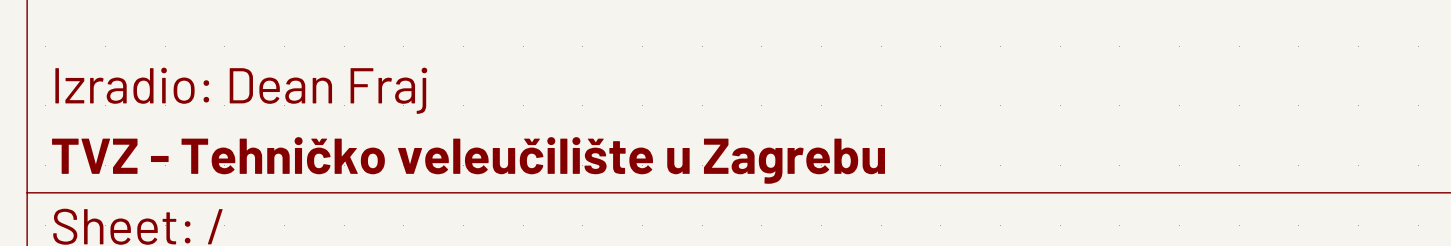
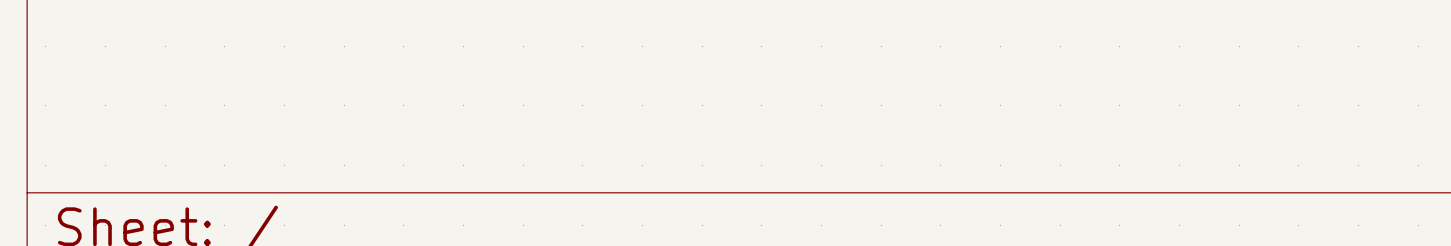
title block: Izradio: Dean Fraj (241, 90) -> none
title block: TVZ - Tehničko veleučilište u Zagrebu (468, 160) -> none

